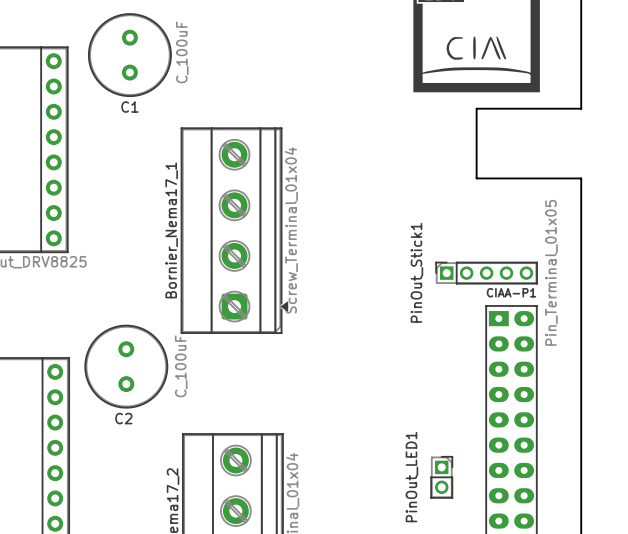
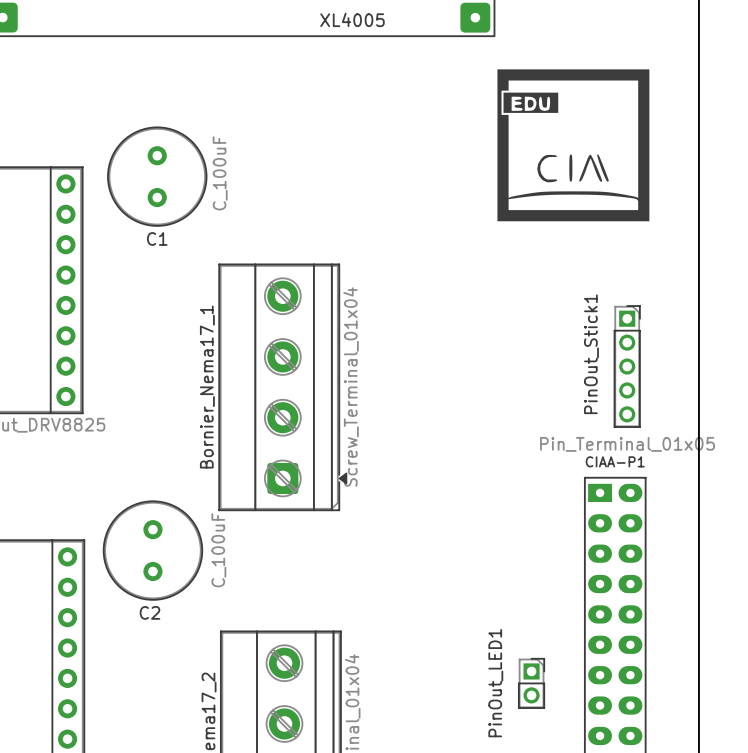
board edge: (581, 108) (476, 108) (476, 178) (581, 178) -> (698, 240) (698, 324)
PinOut_Stick1 name position: PinOut_Stick1 (416, 272) -> PinOut_Stick1 (591, 354)
PinOut_Stick1 rotation: 0° (486, 273) -> 90° clockwise (627, 366)
PinOut_Stick1 position: (486, 273) -> (627, 366)

